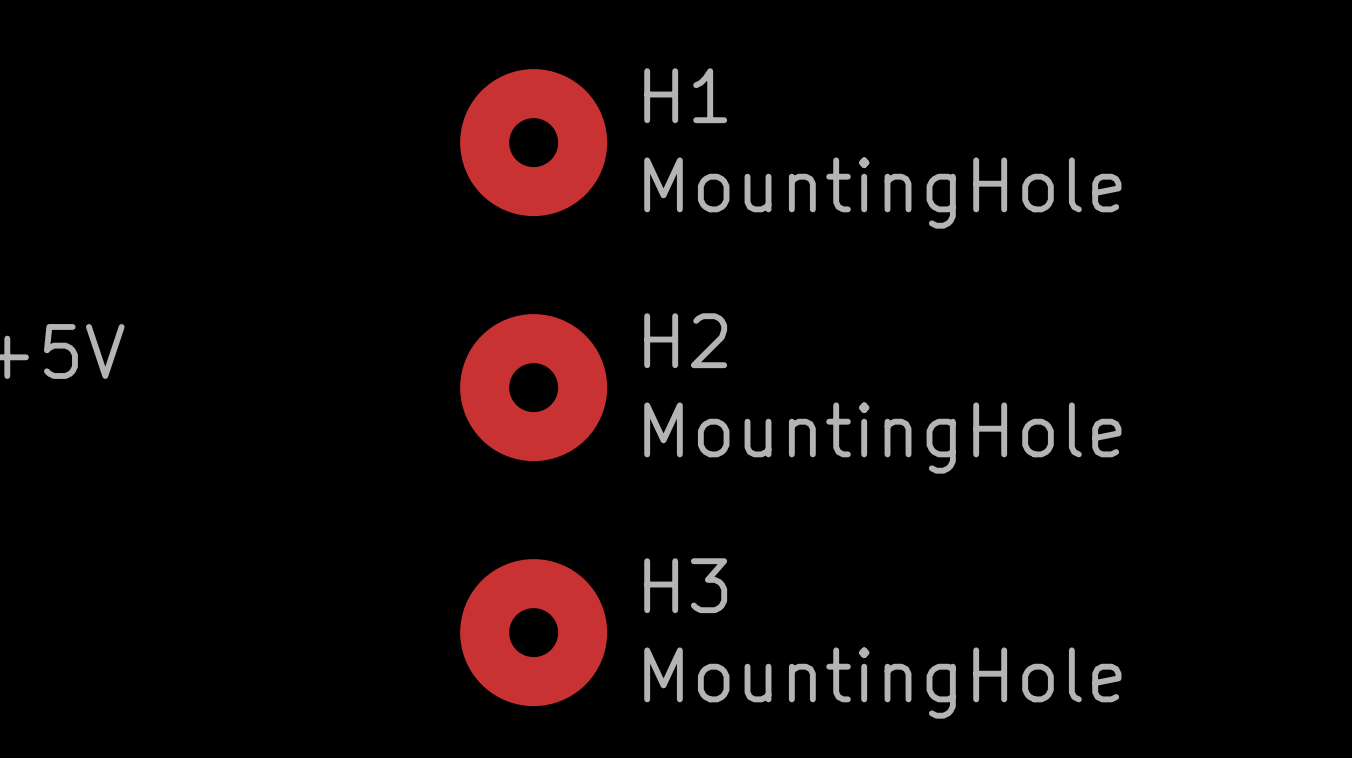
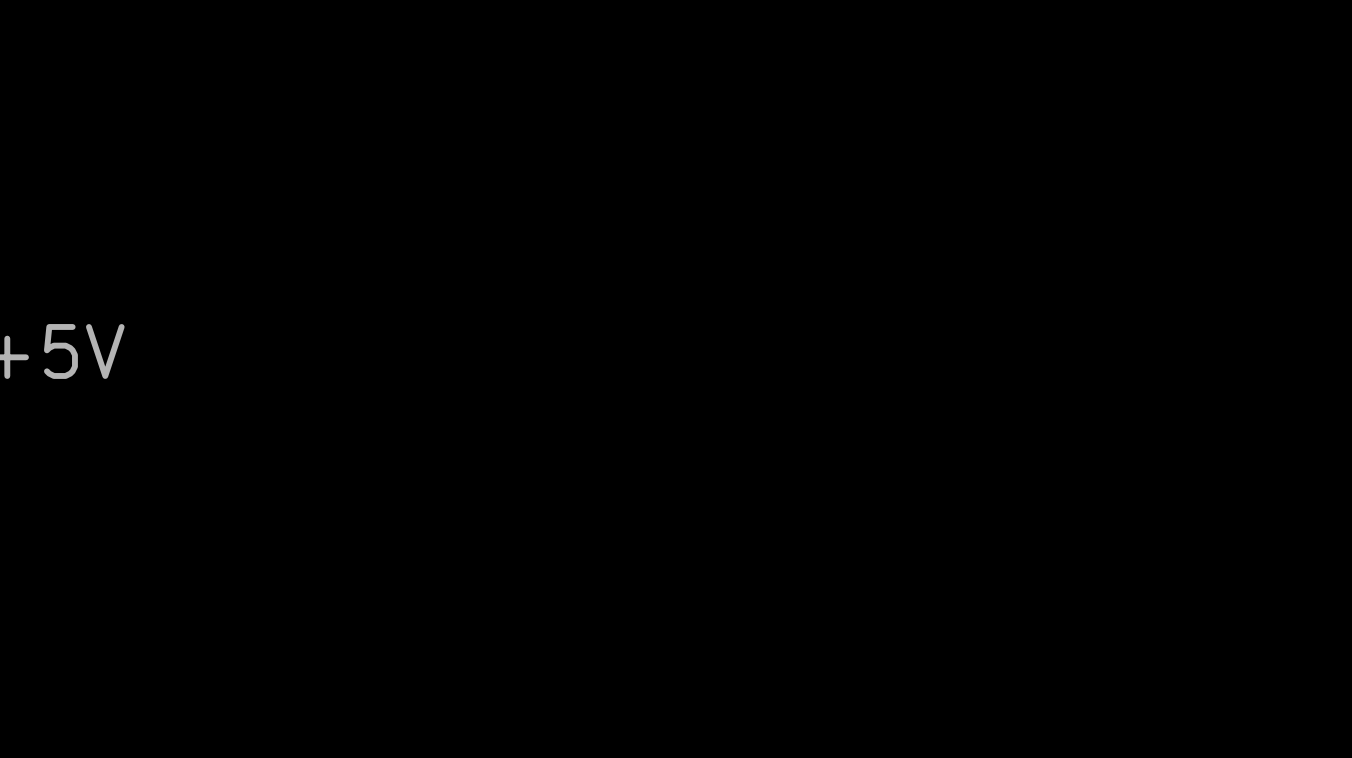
H1: MountingHole (533, 142) -> none
H2: MountingHole (533, 387) -> none
H3: MountingHole (533, 632) -> none

